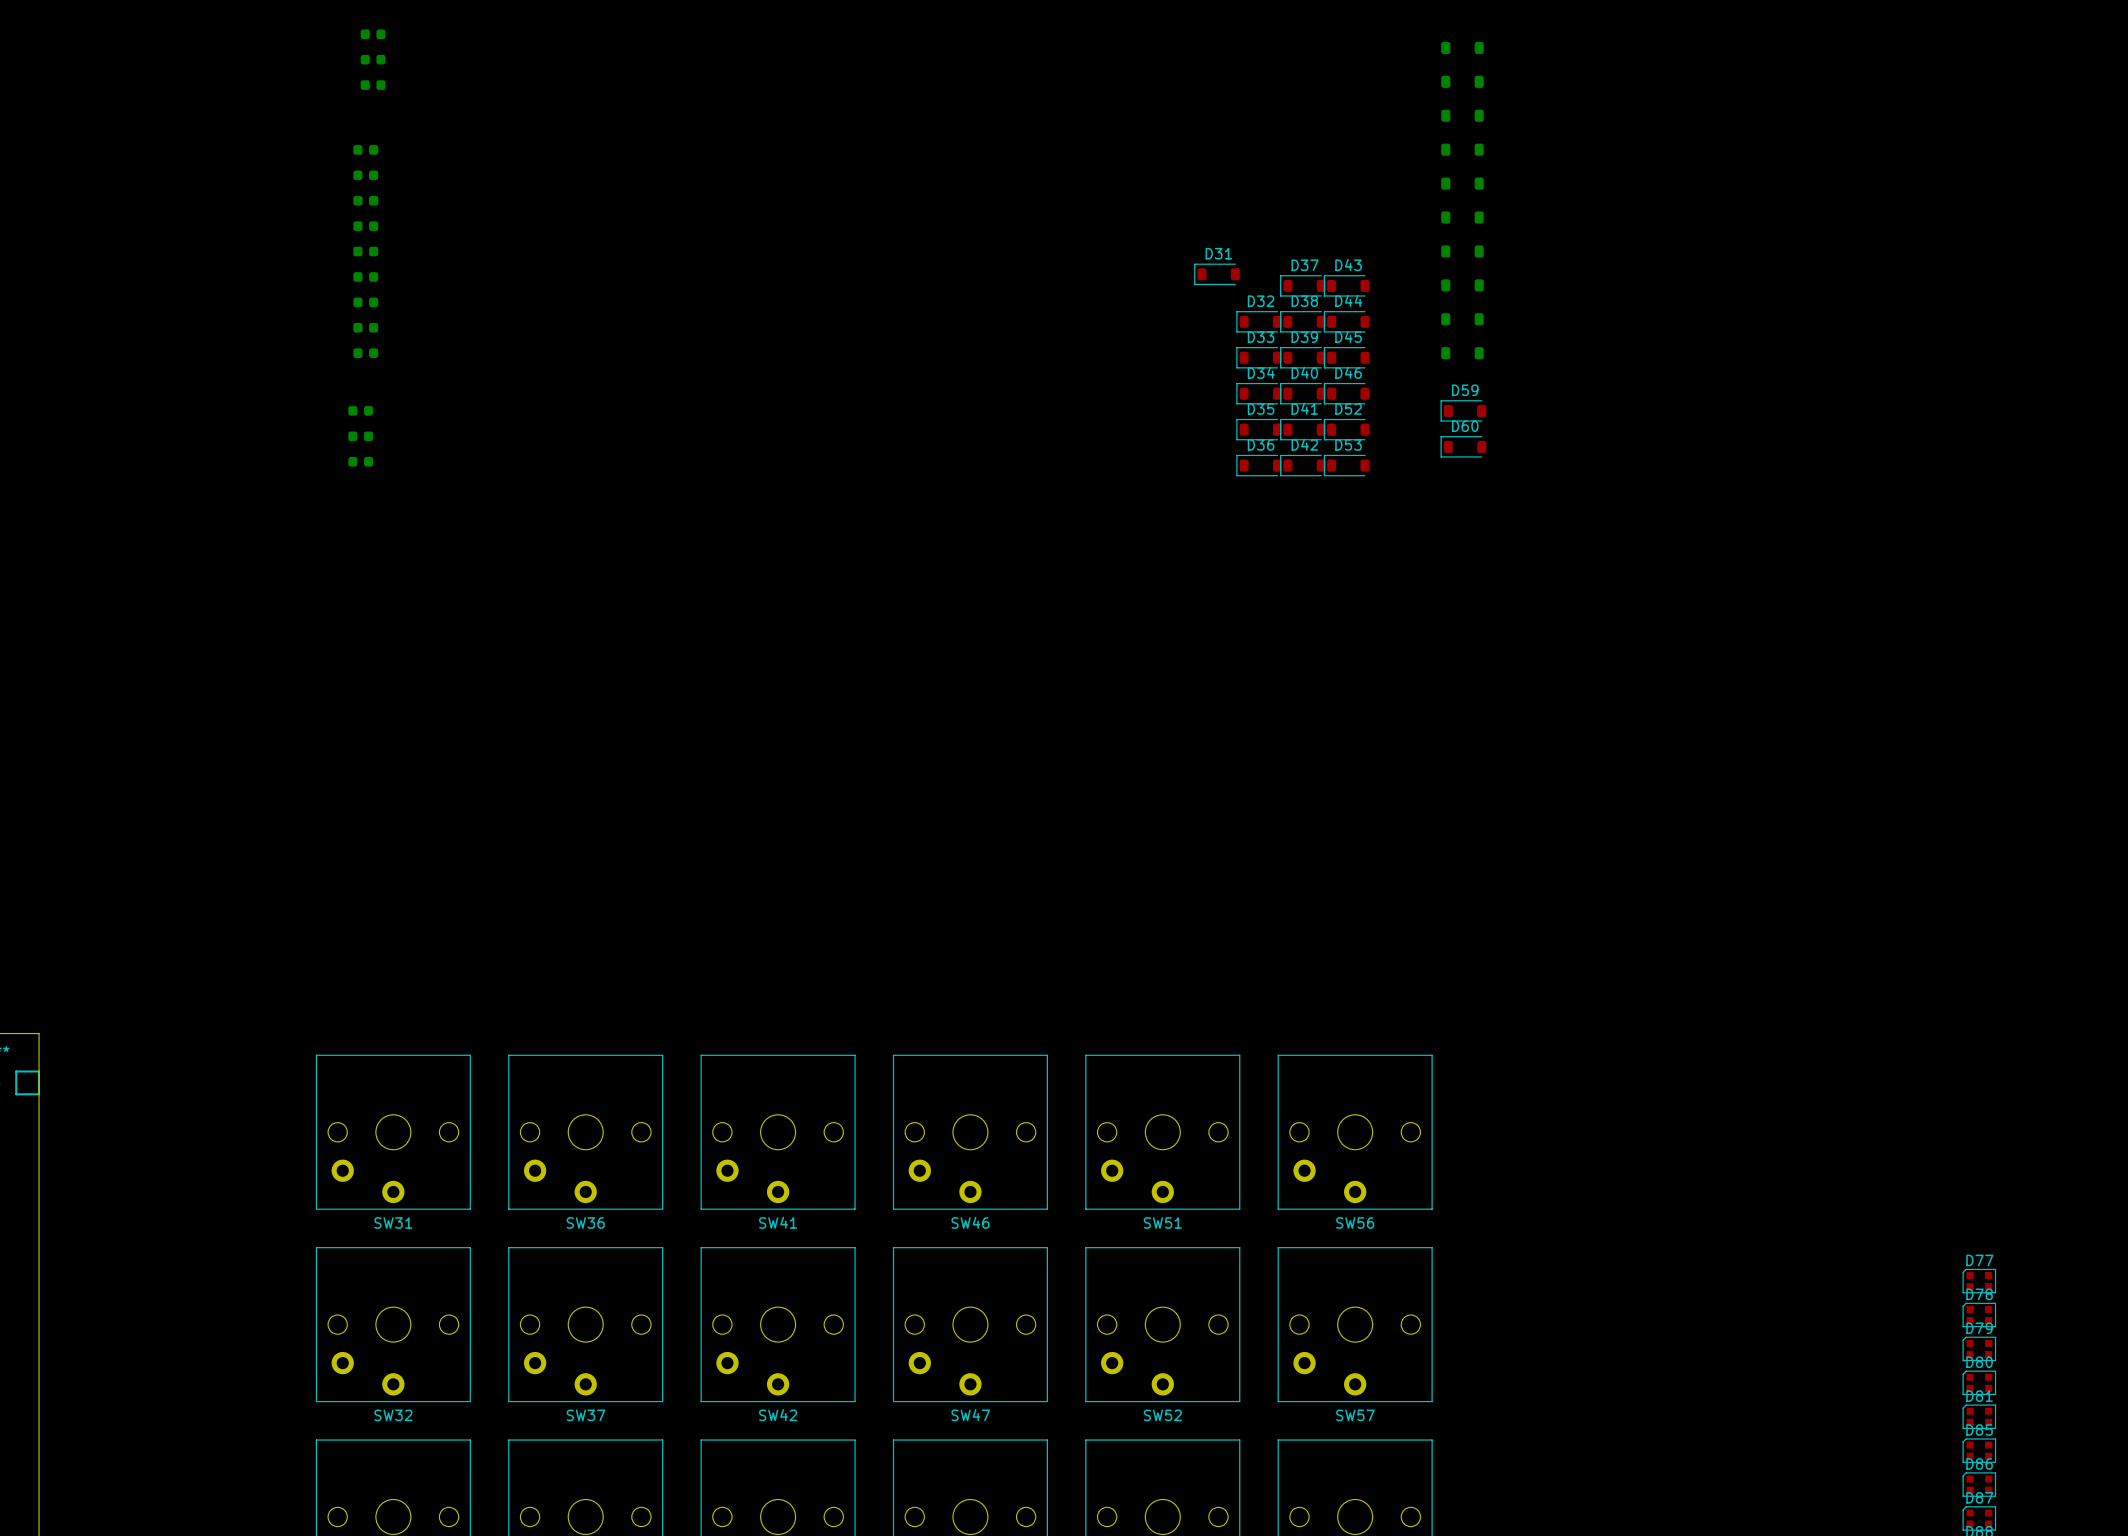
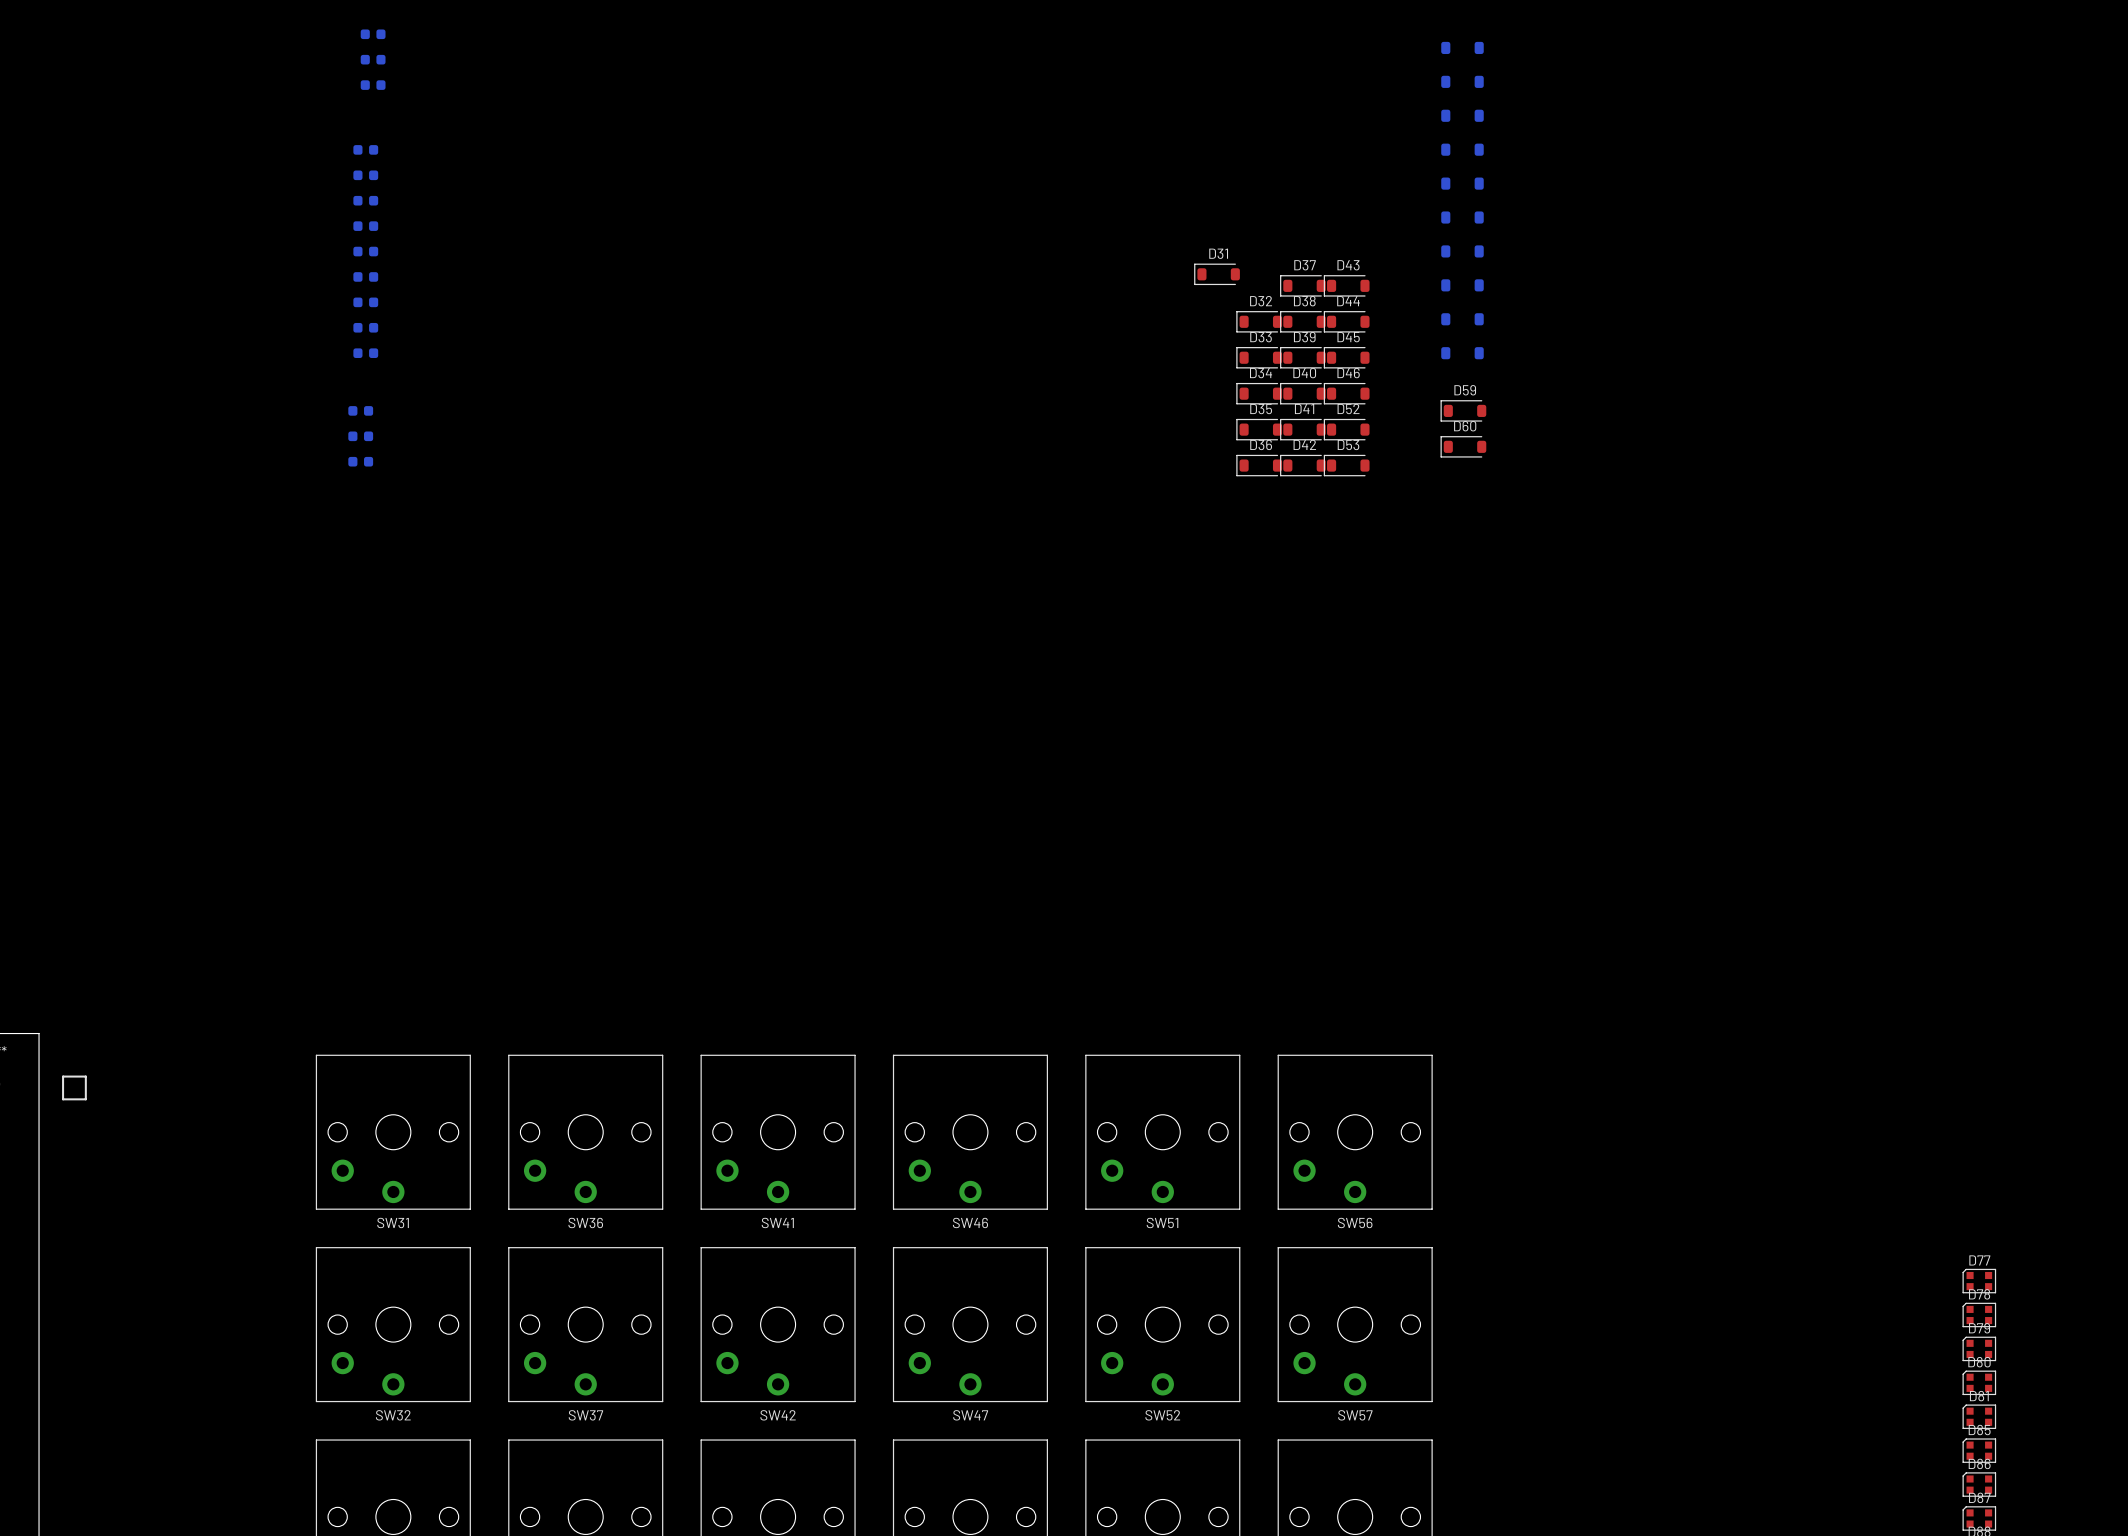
line: (16, 1071) (39, 1071) (39, 1094) (16, 1094) (16, 1071) -> (63, 1076) (85, 1076) (85, 1099) (63, 1099) (63, 1076)

